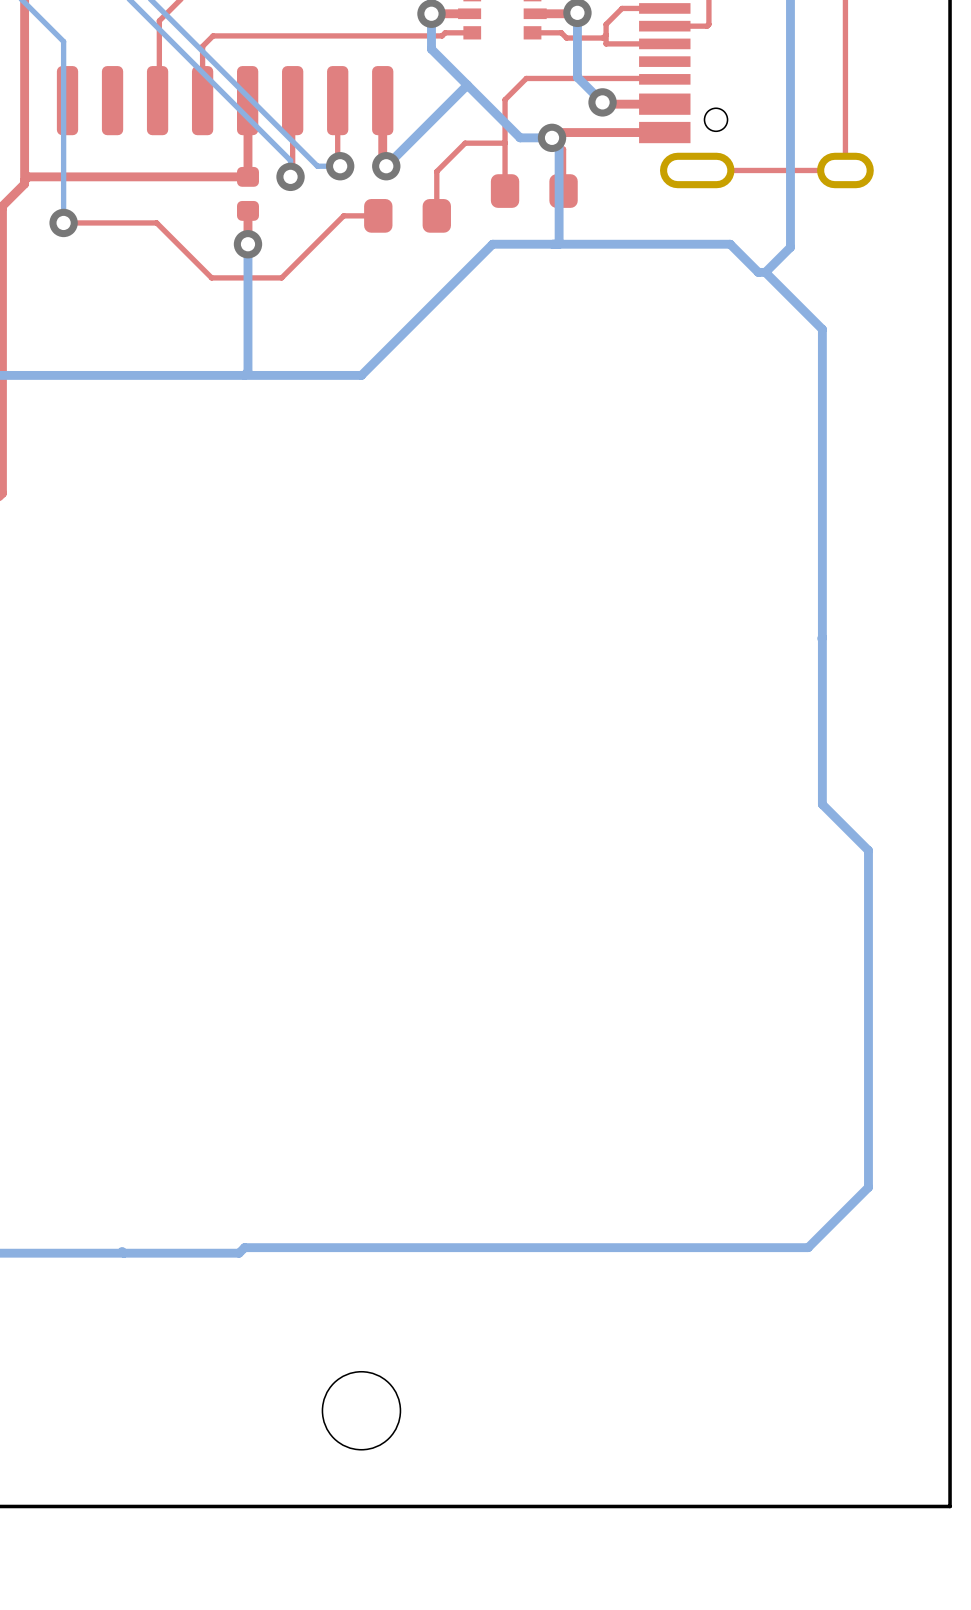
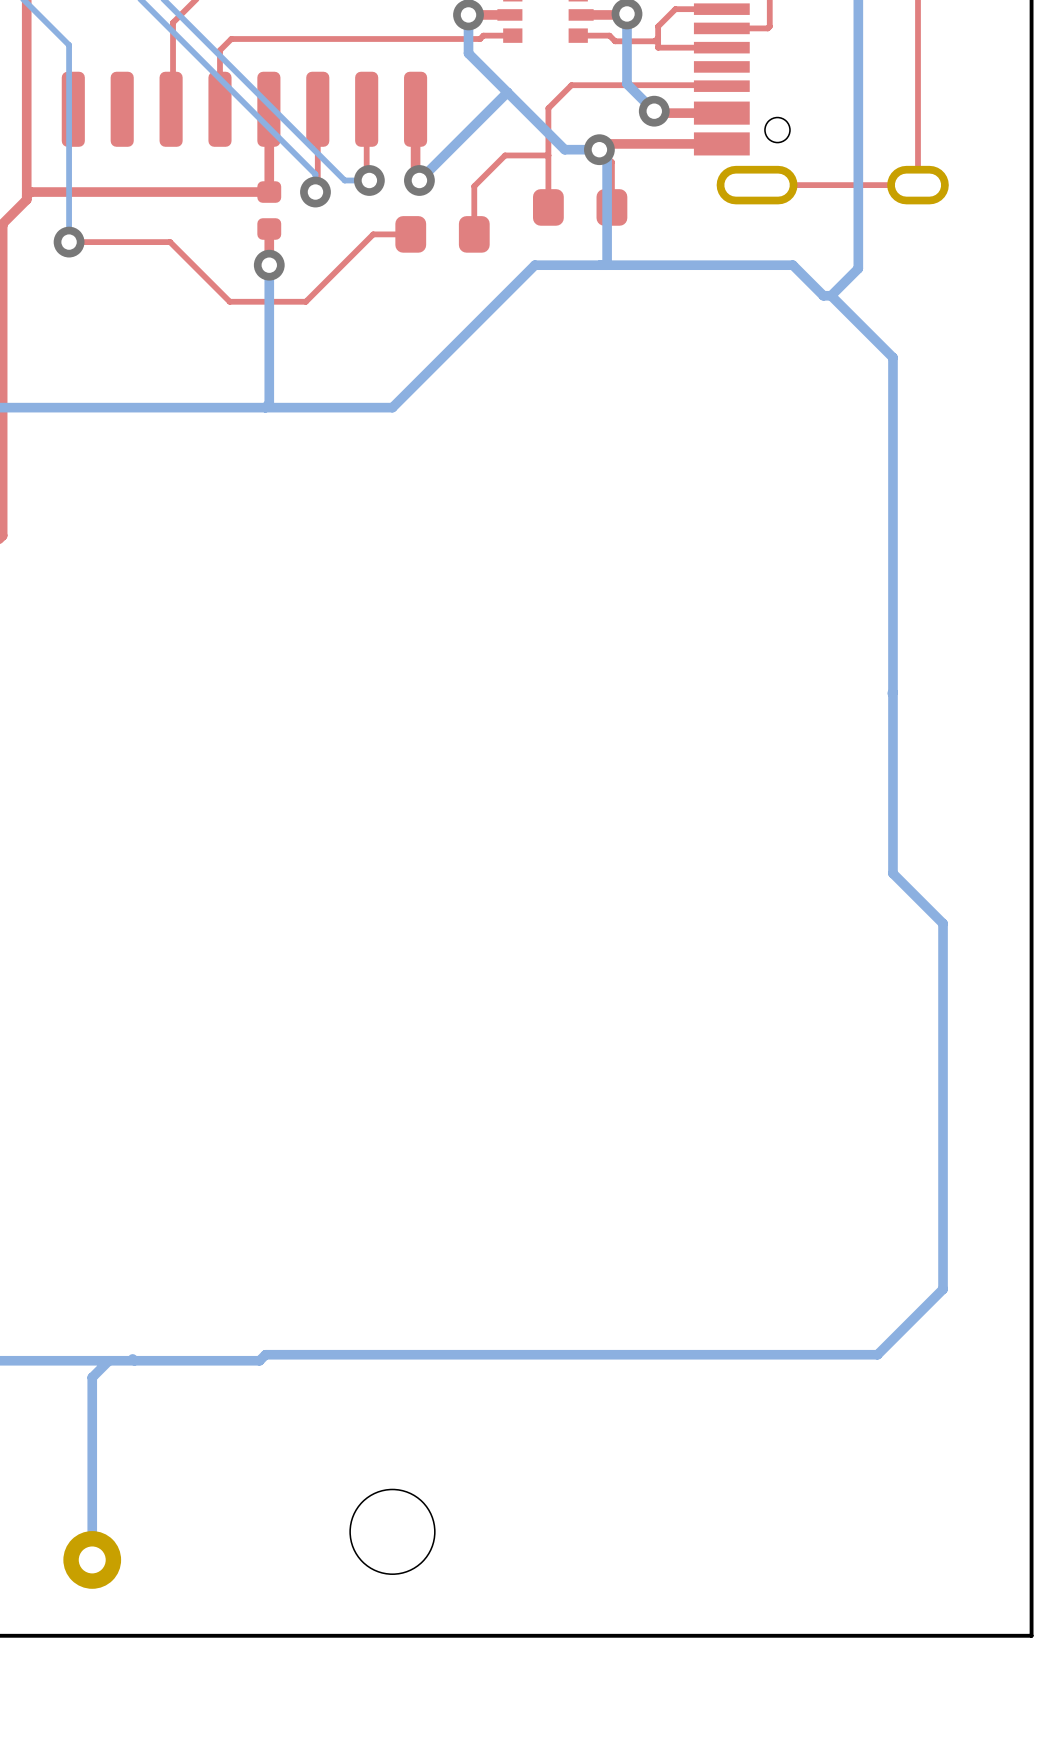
bottom track: none -> (108, 1360) (92, 1377) (92, 1559)
part: none -> (92, 1559)

